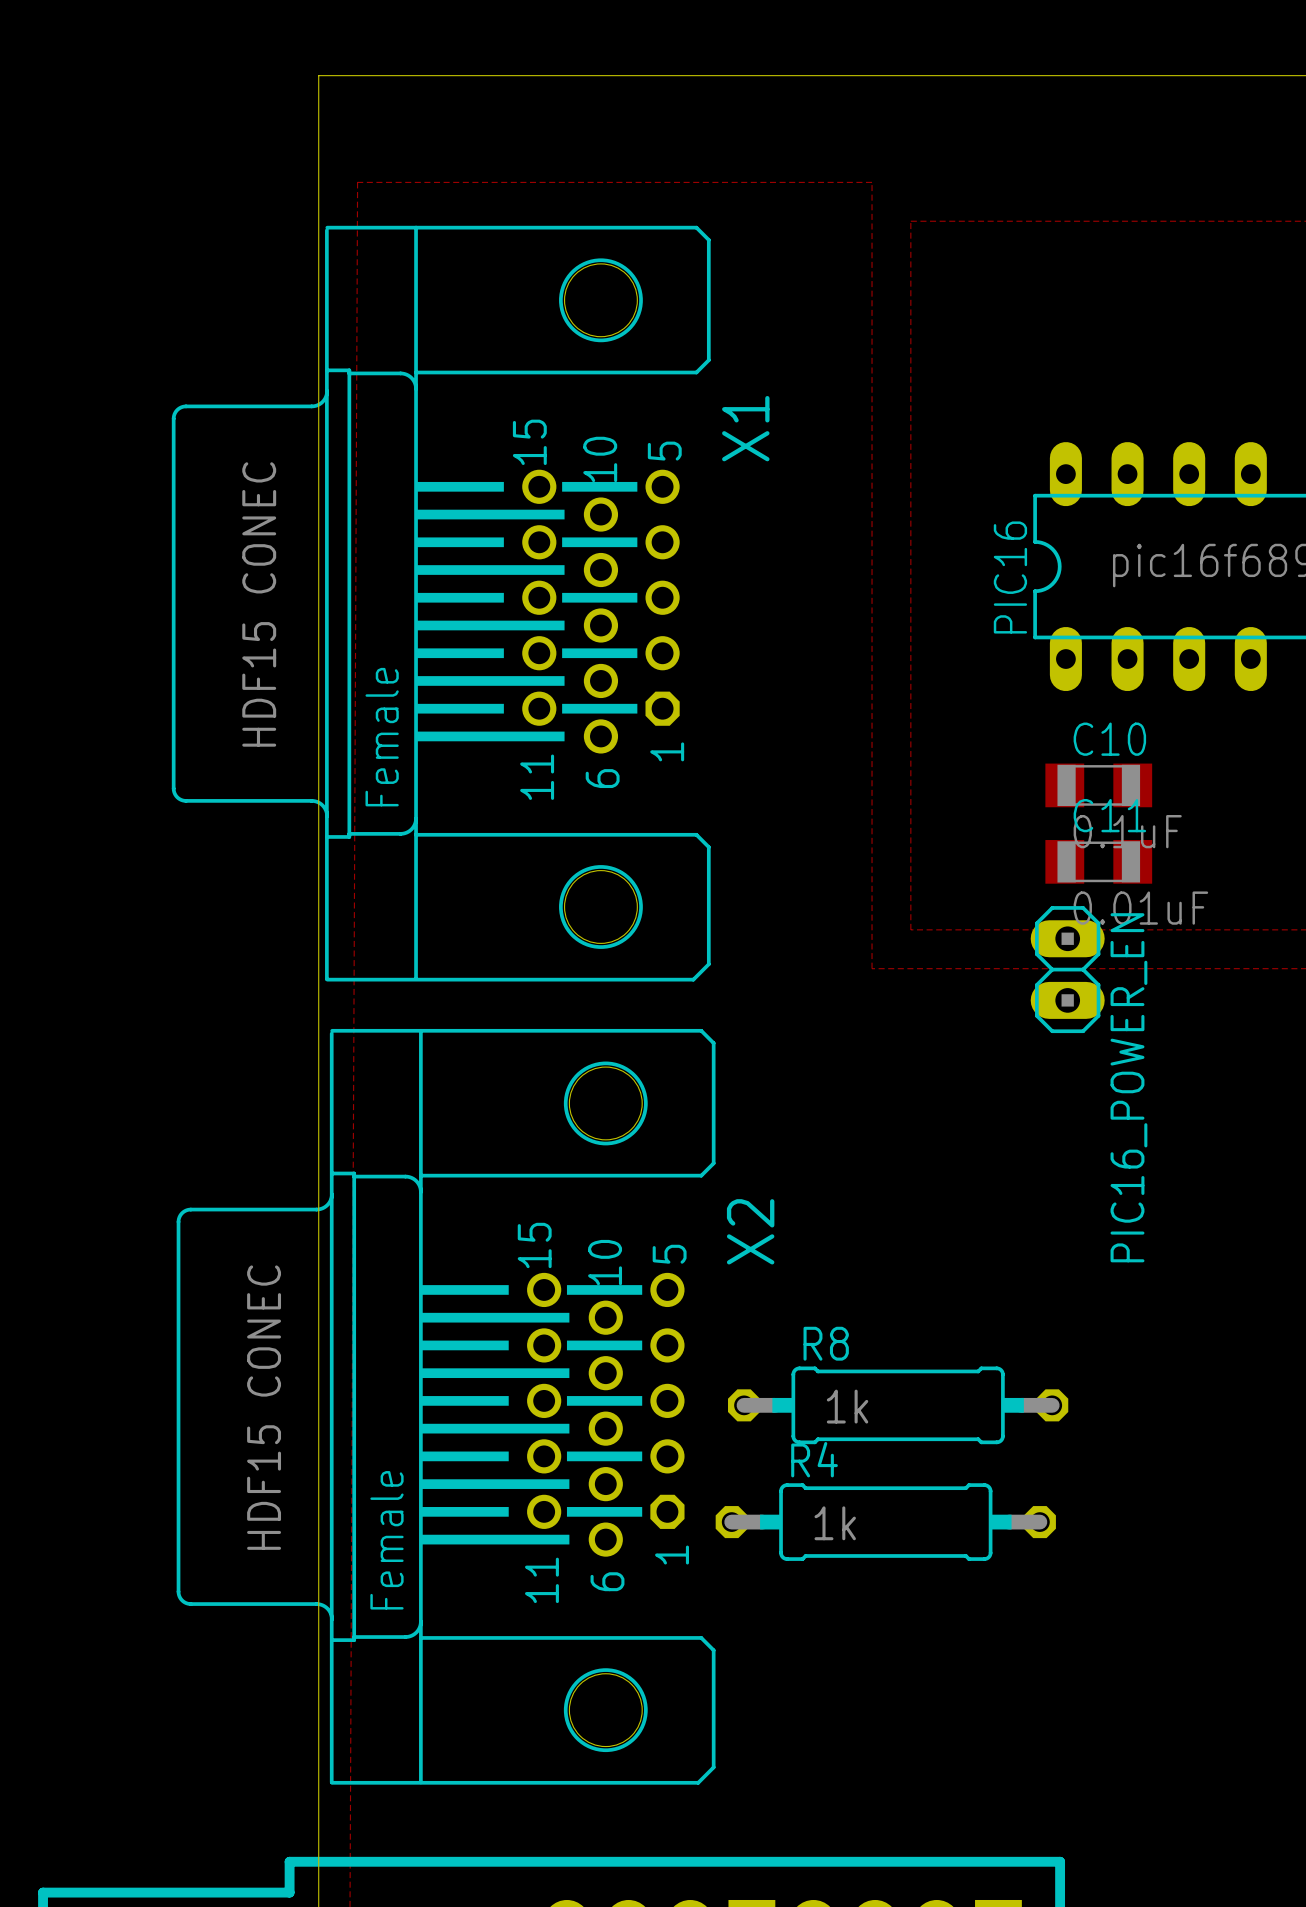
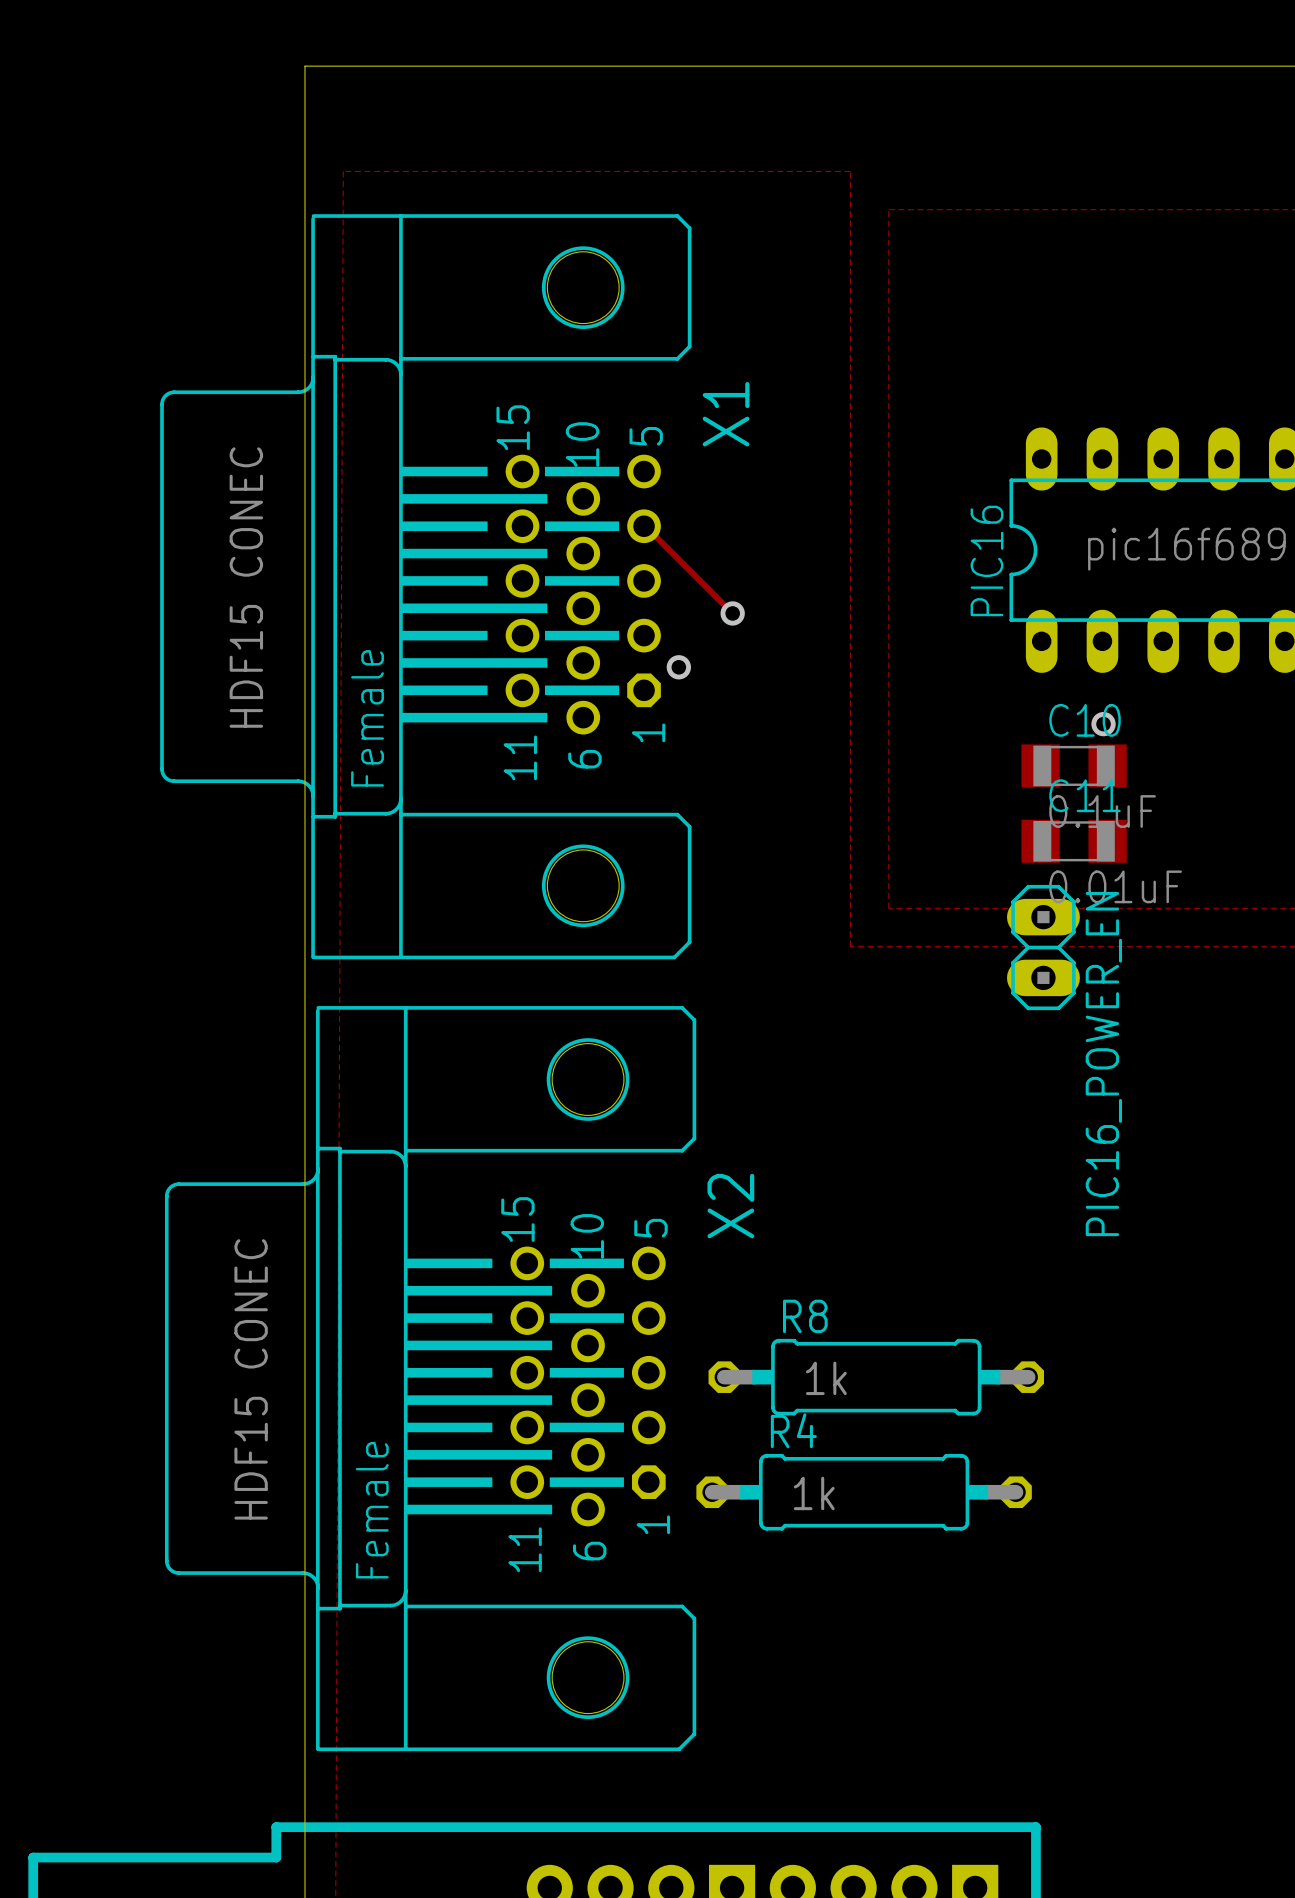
track: none -> (644, 526) (732, 613)
via: none -> (732, 613)
via: none -> (678, 667)
via: none -> (1103, 724)

